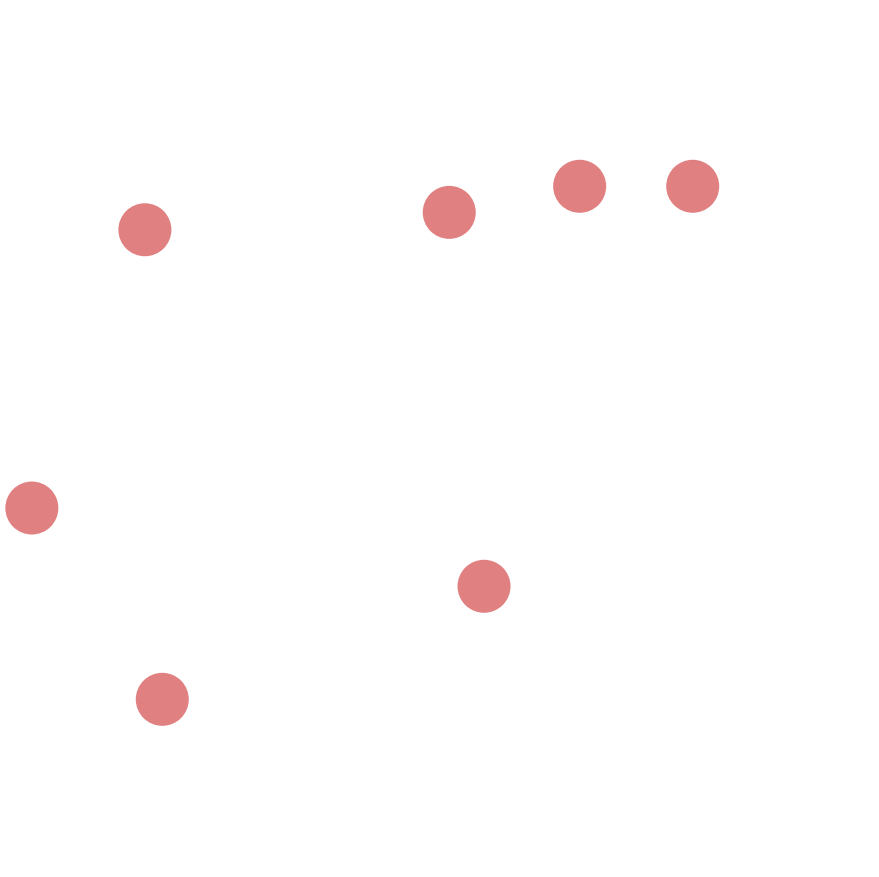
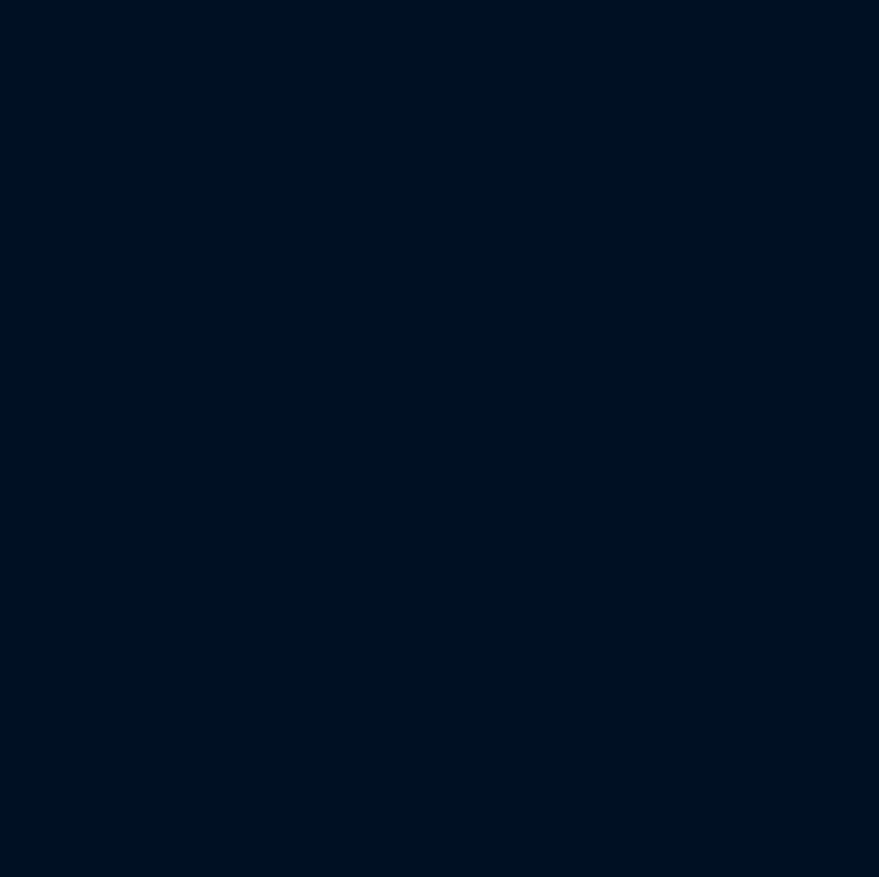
part: (579, 186) -> none
part: (692, 186) -> none
part: (449, 212) -> none
part: (144, 229) -> none
part: (31, 508) -> none
part: (484, 586) -> none
part: (162, 699) -> none

